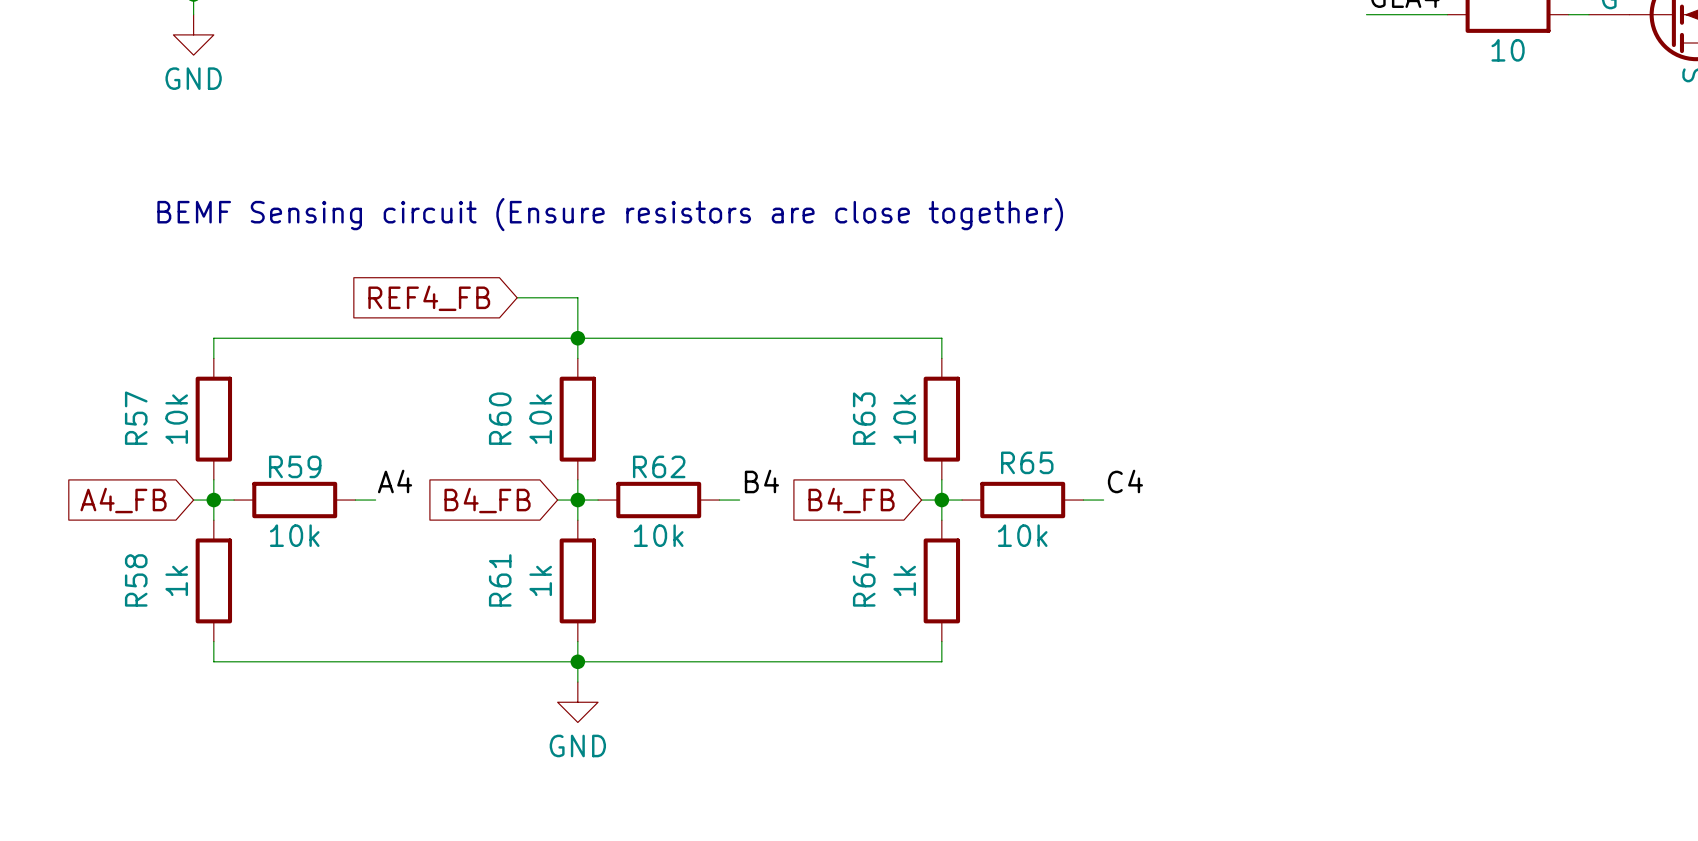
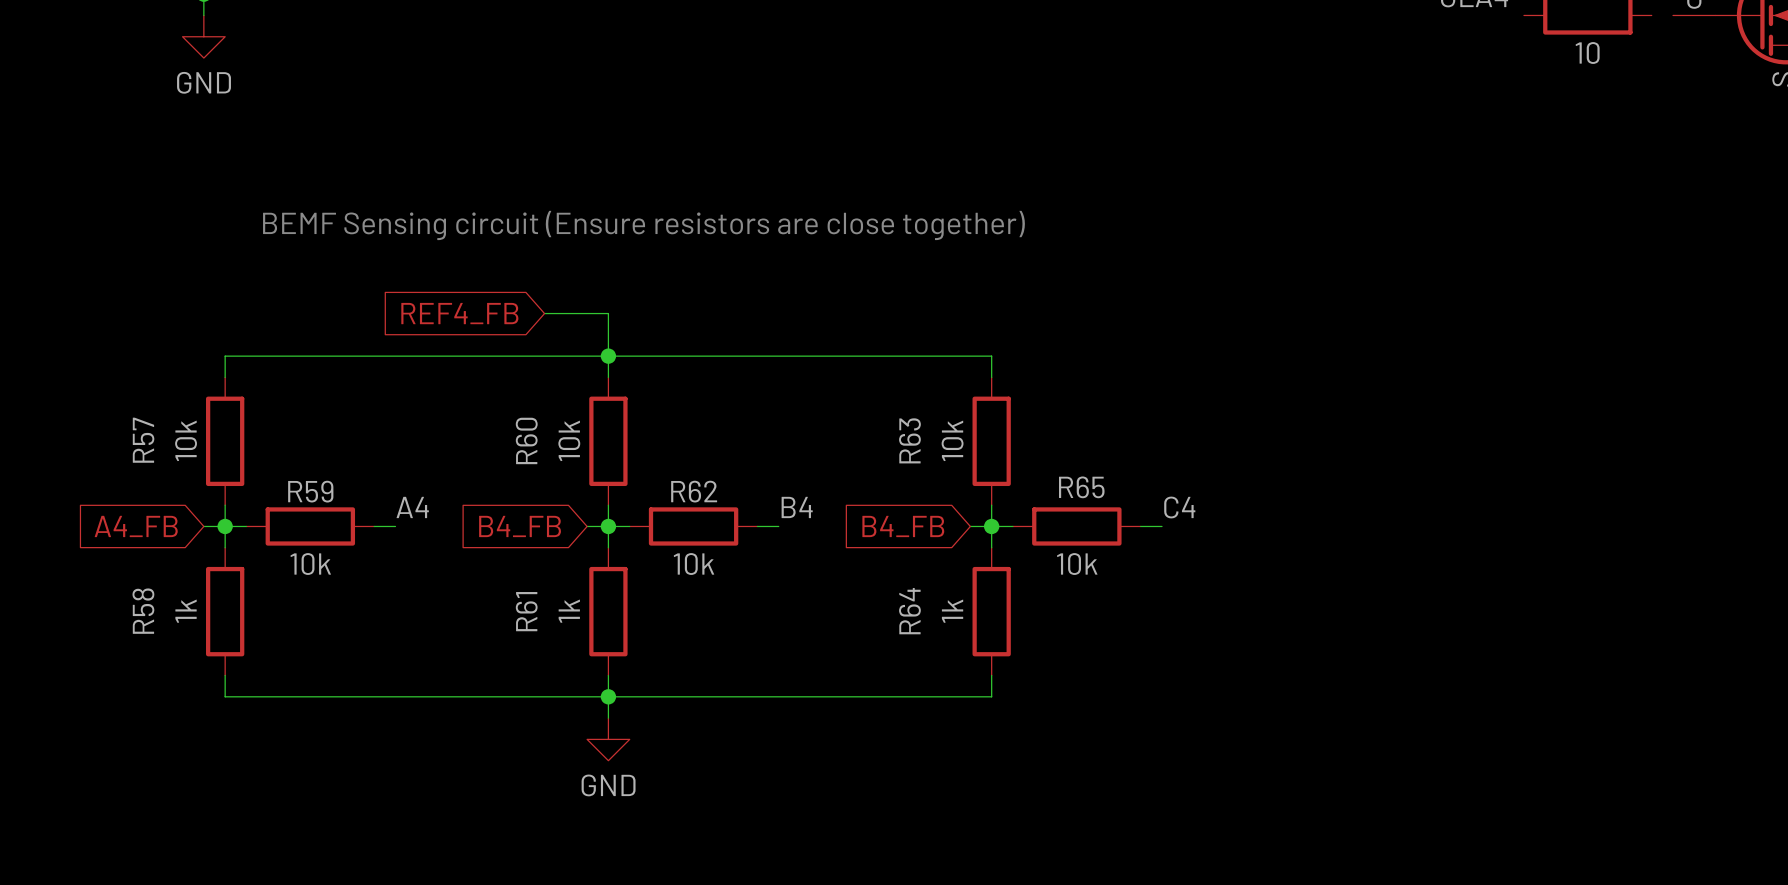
wire: (1366, 14) (1447, 14) -> none
wire: (1568, 14) (1588, 14) -> none

